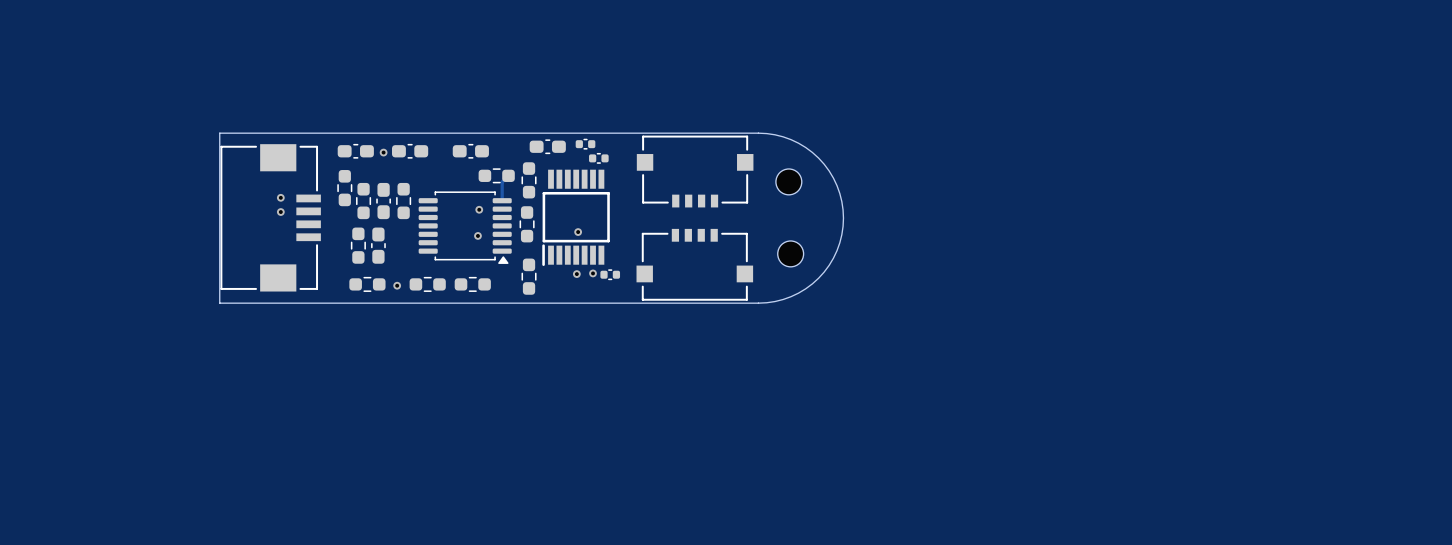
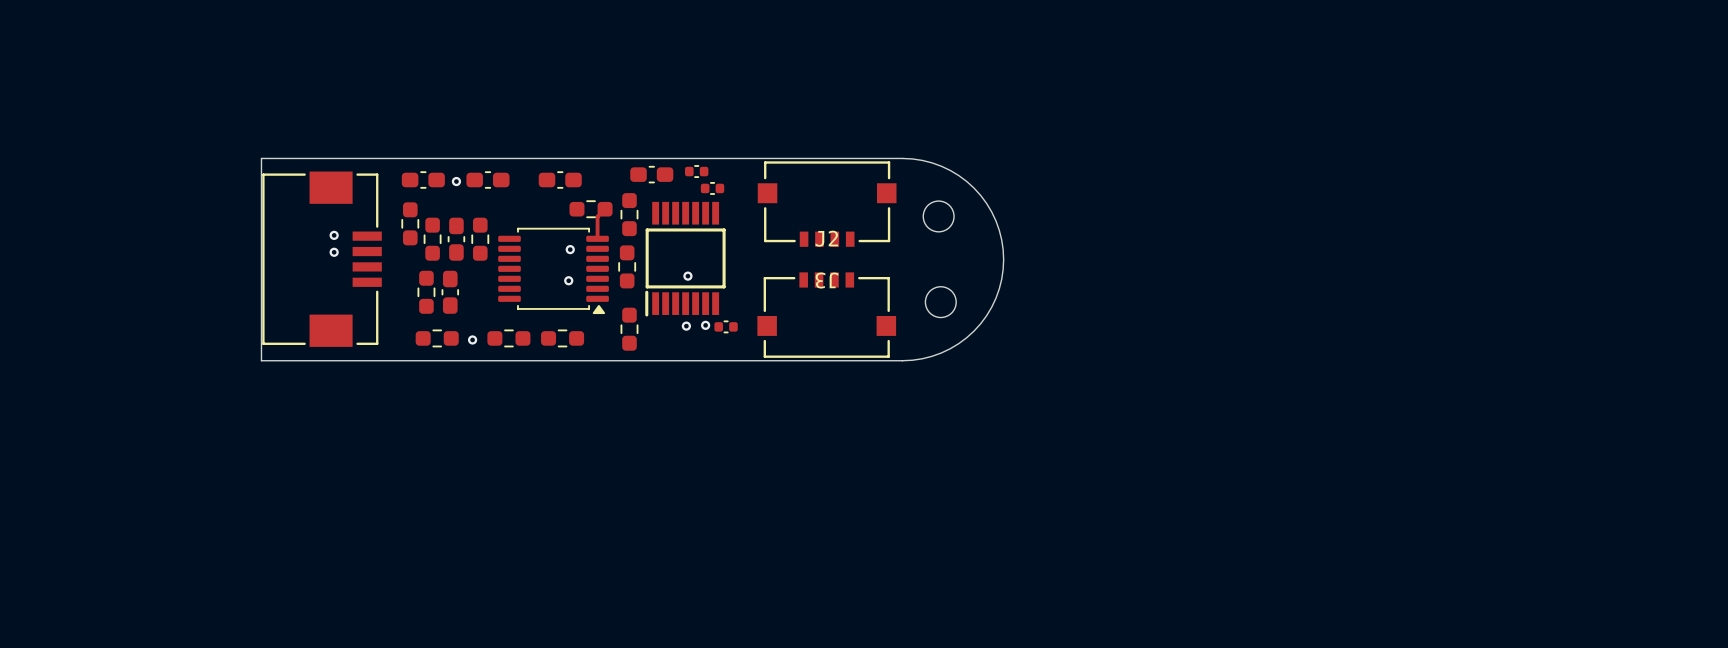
J2 name: none -> J2 (826, 238)
J3 name: none -> J3 (826, 280)

